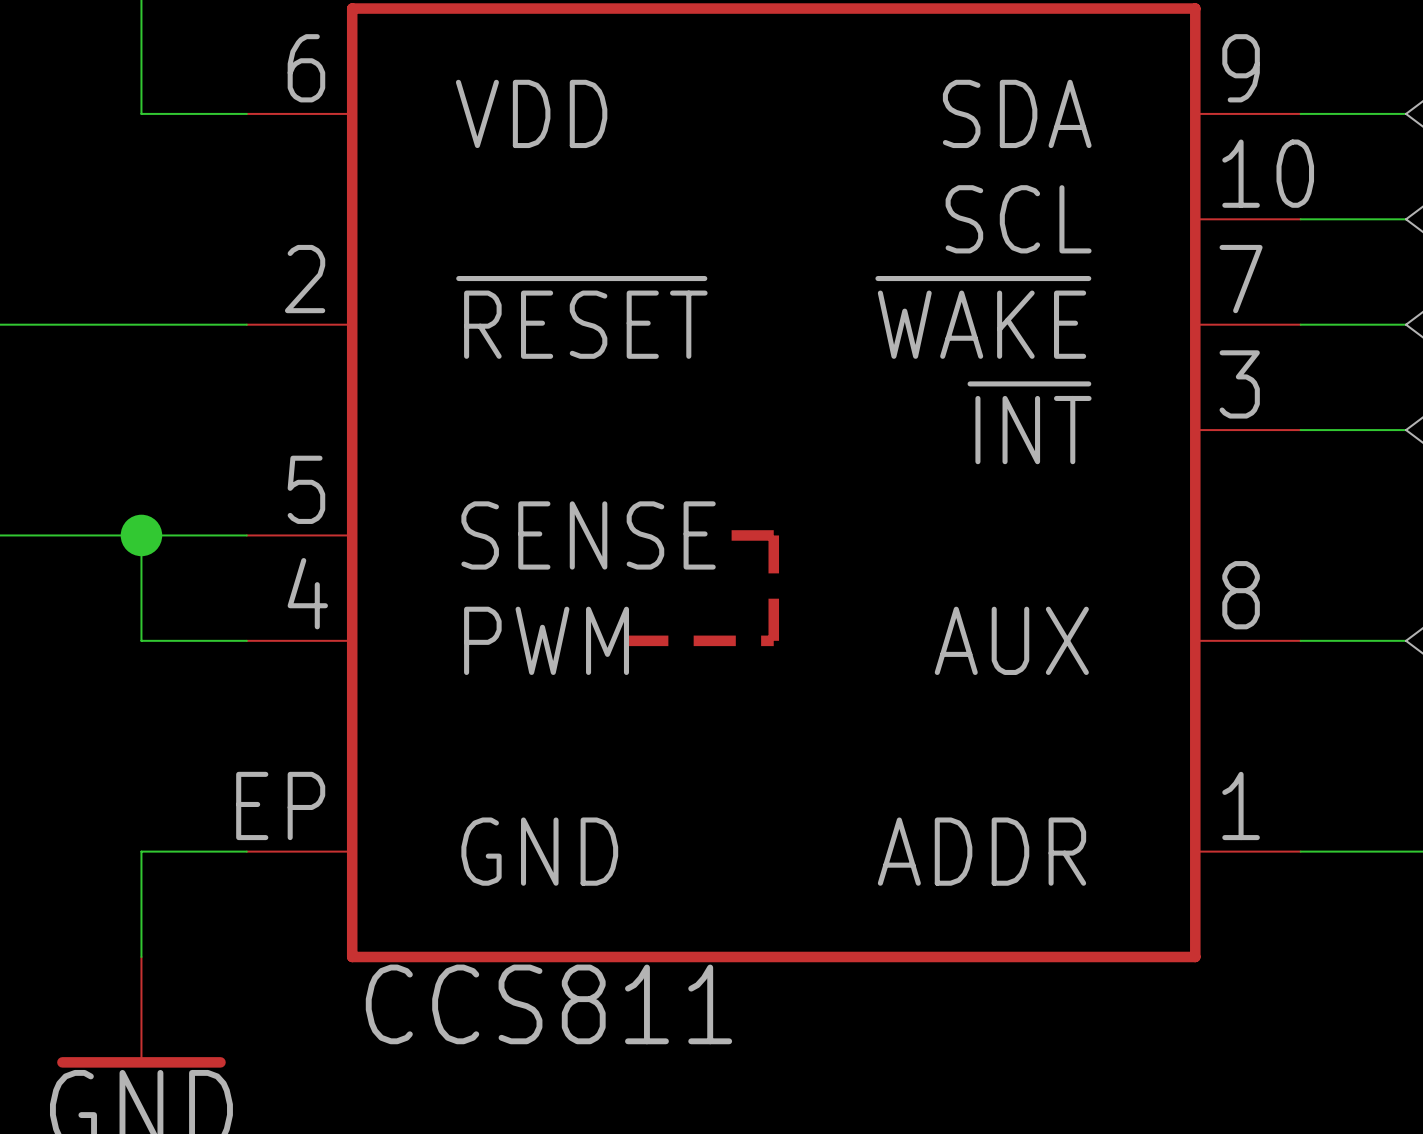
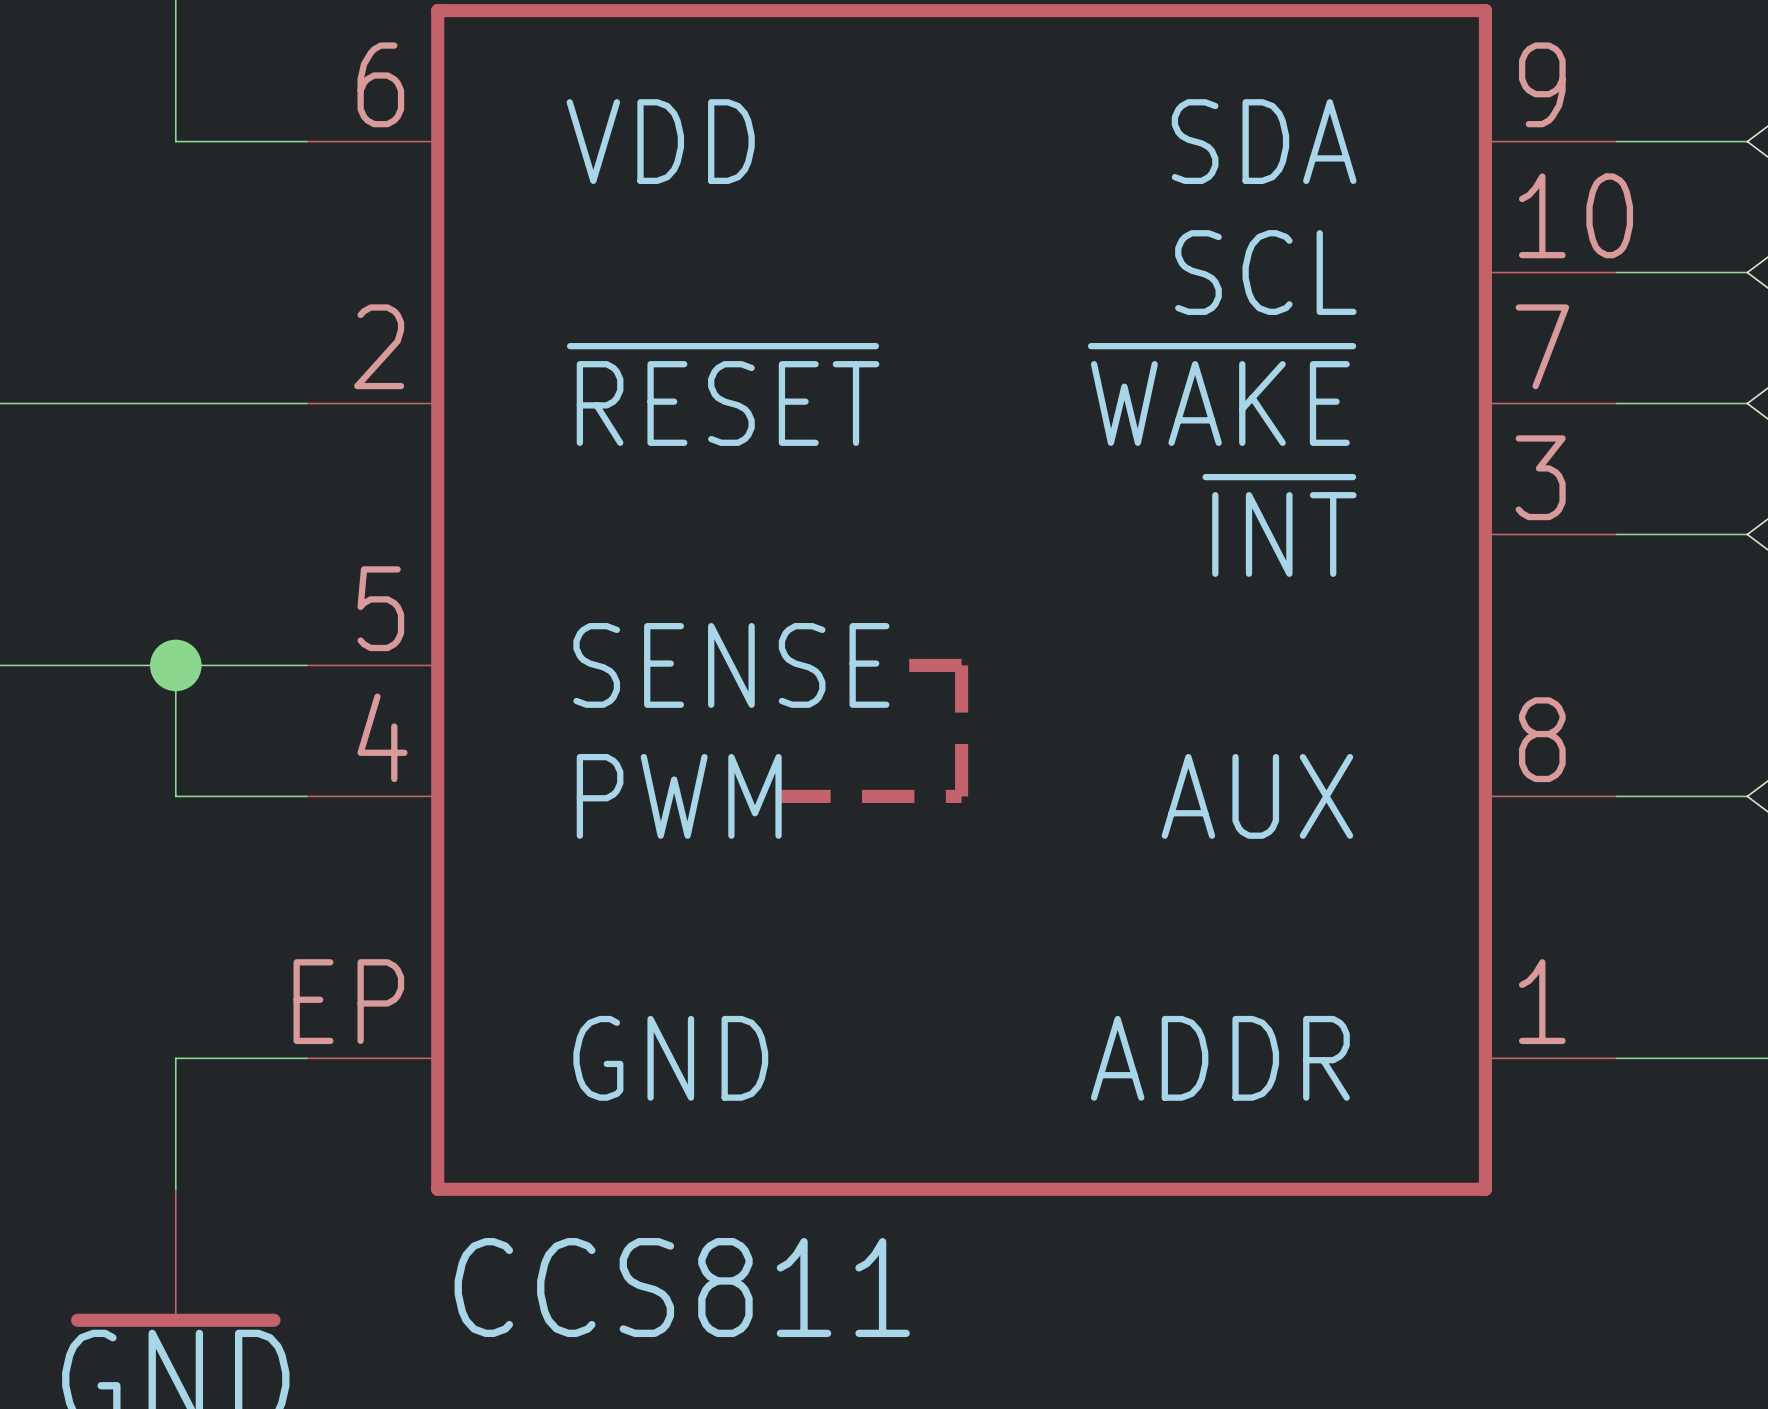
part value position: CCS811 (548, 1004) -> CCS811 (682, 1287)

